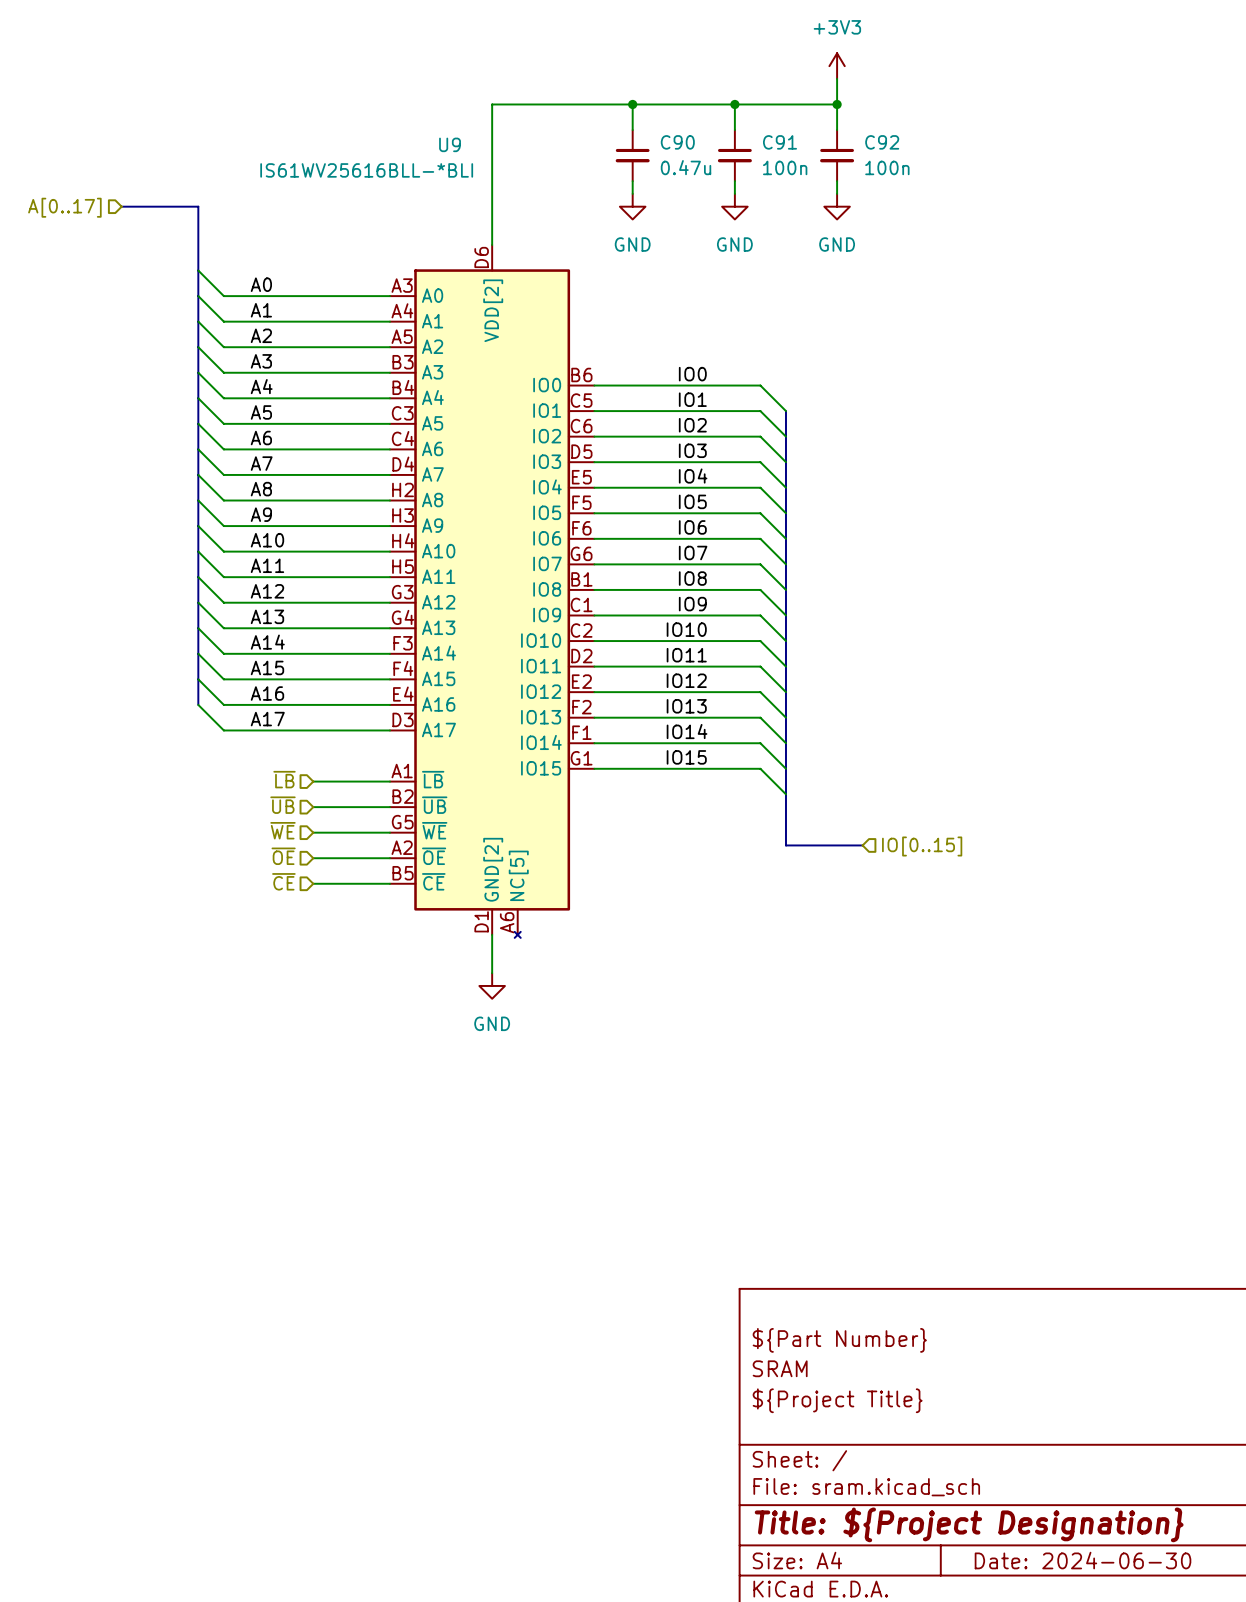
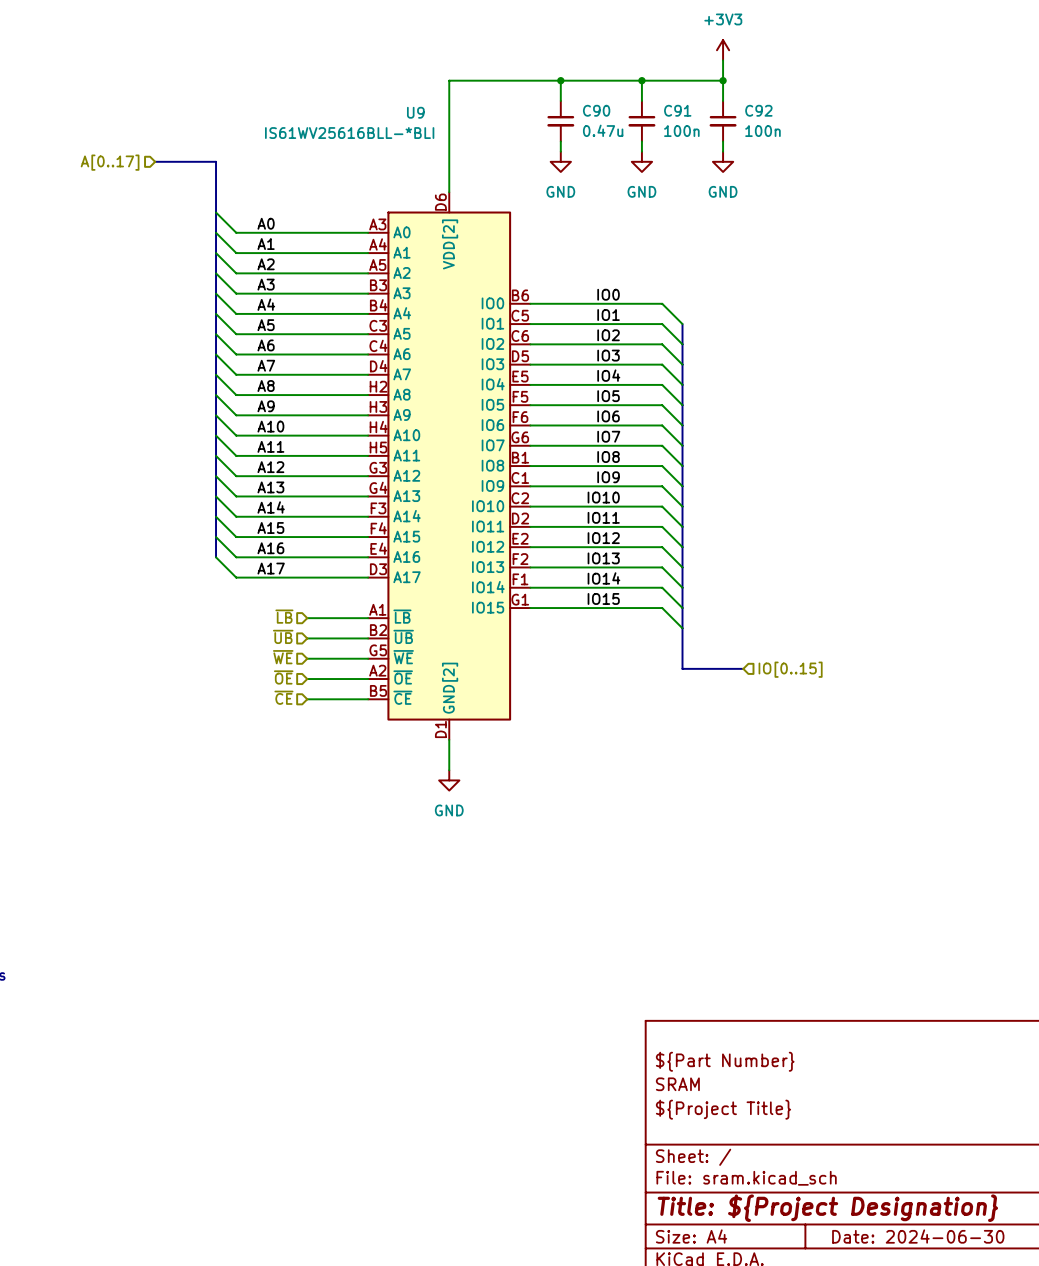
U9 symbol: [389, 245, 595, 938] -> [368, 192, 531, 740]

